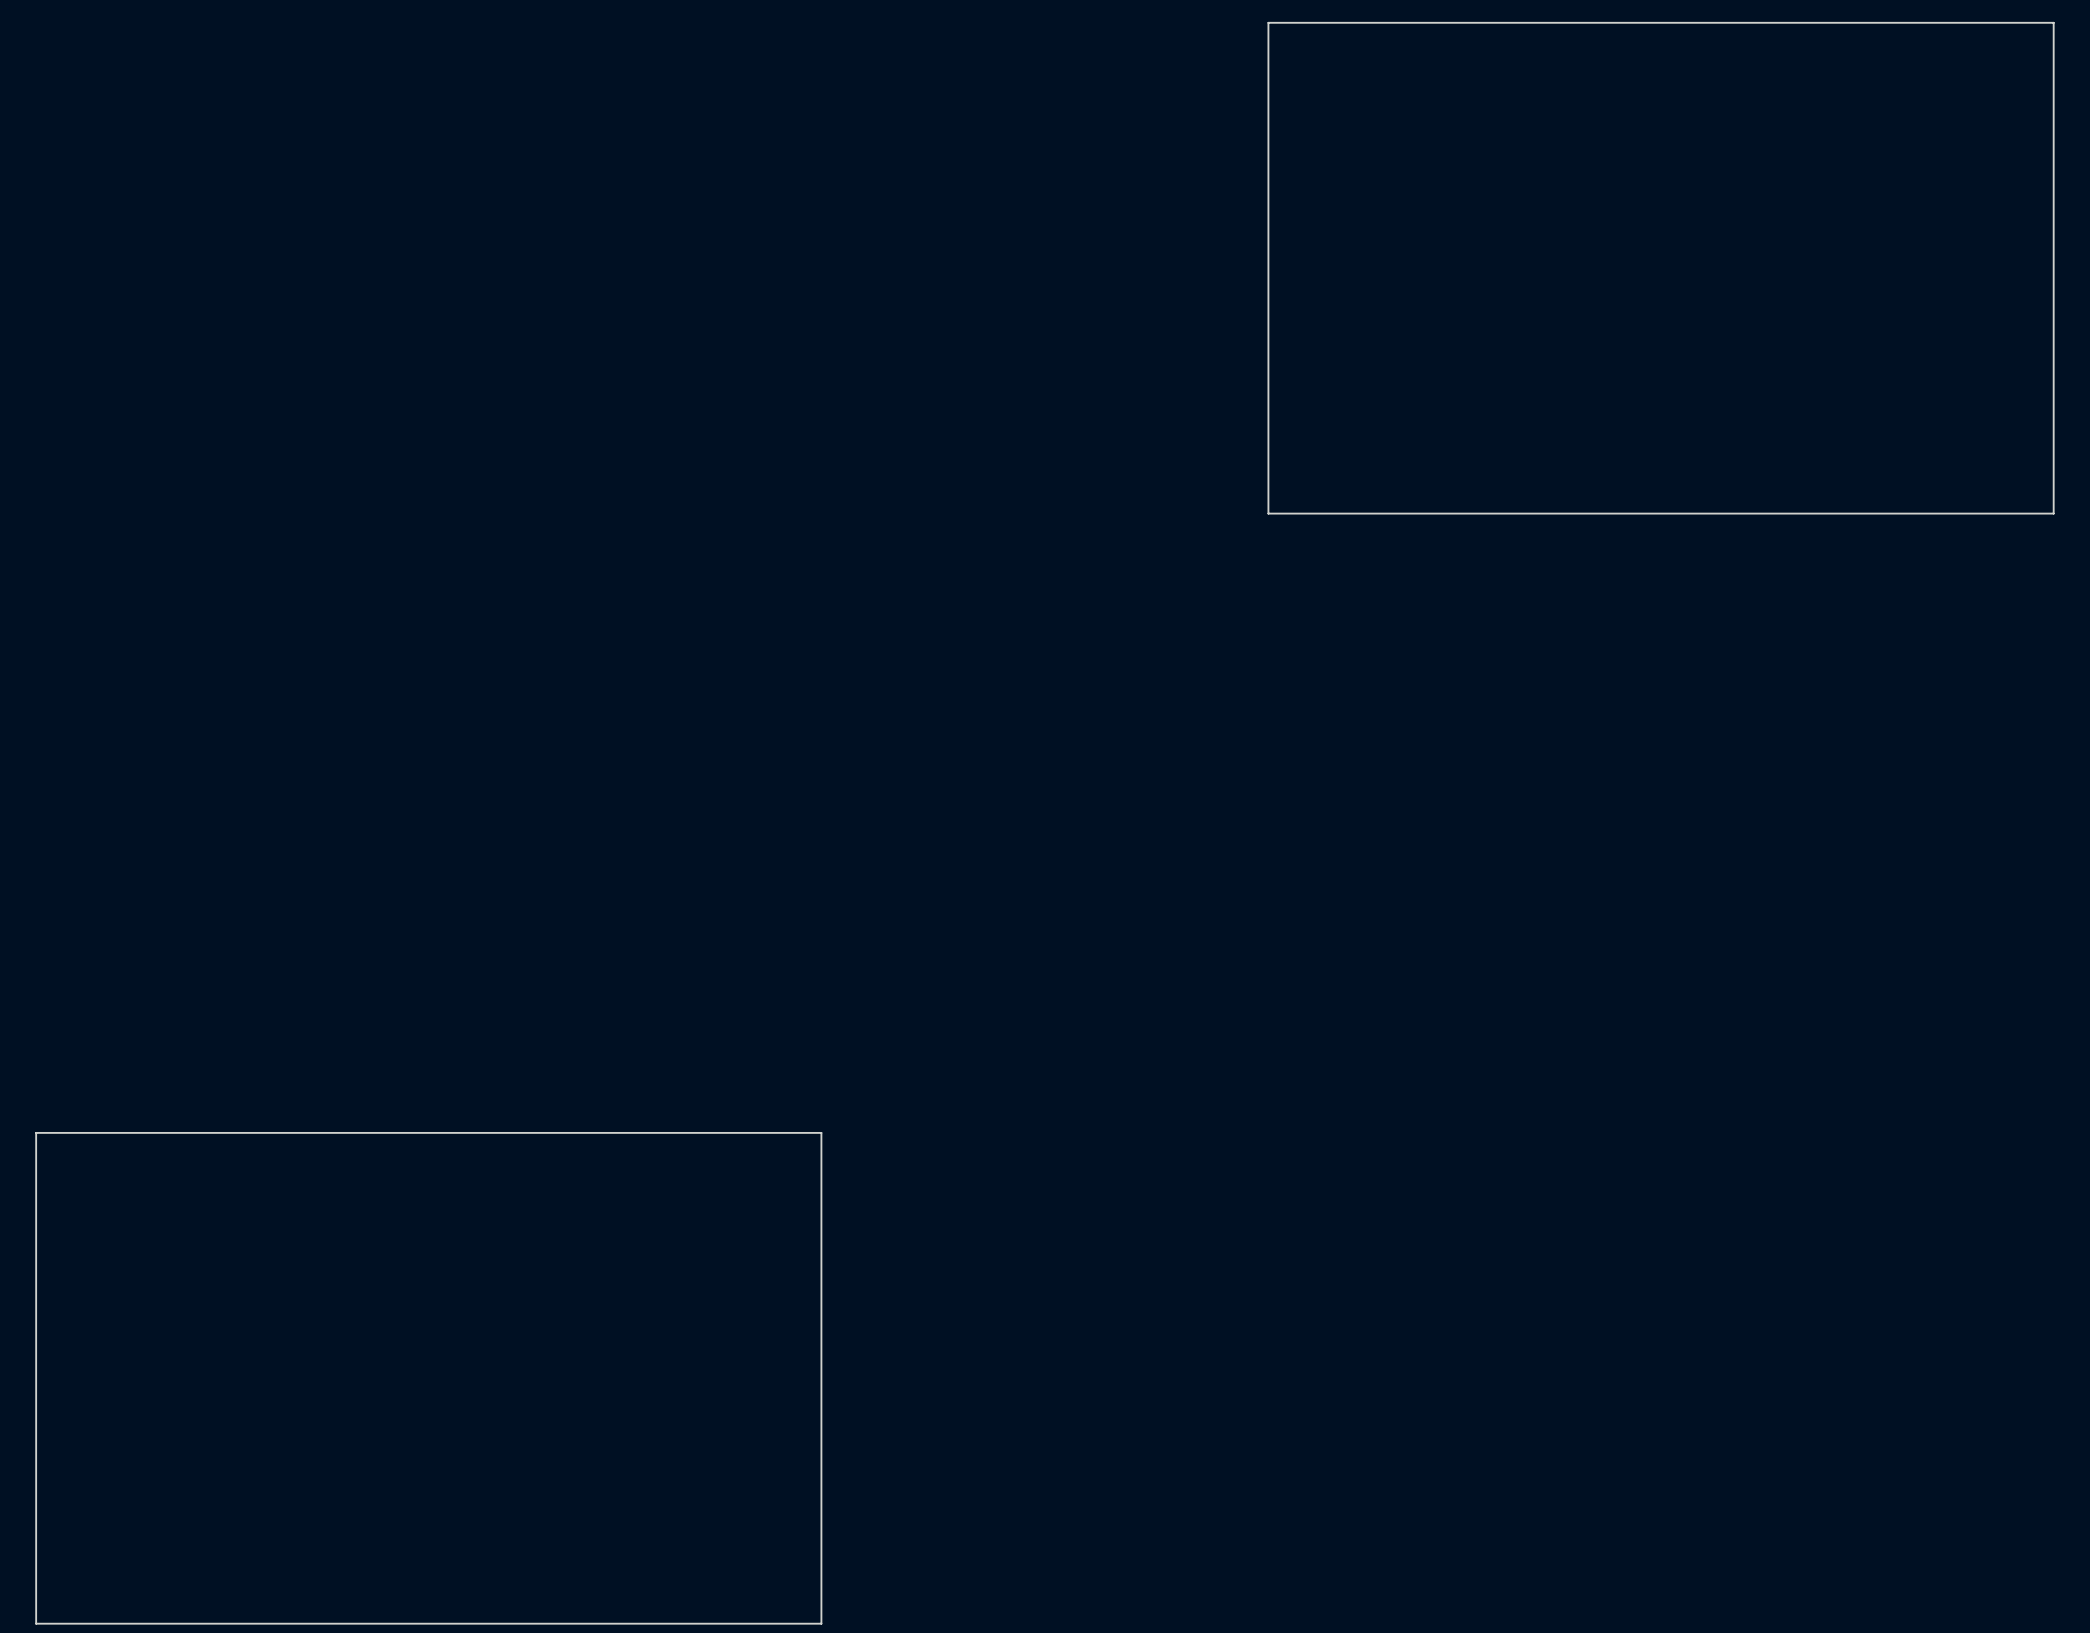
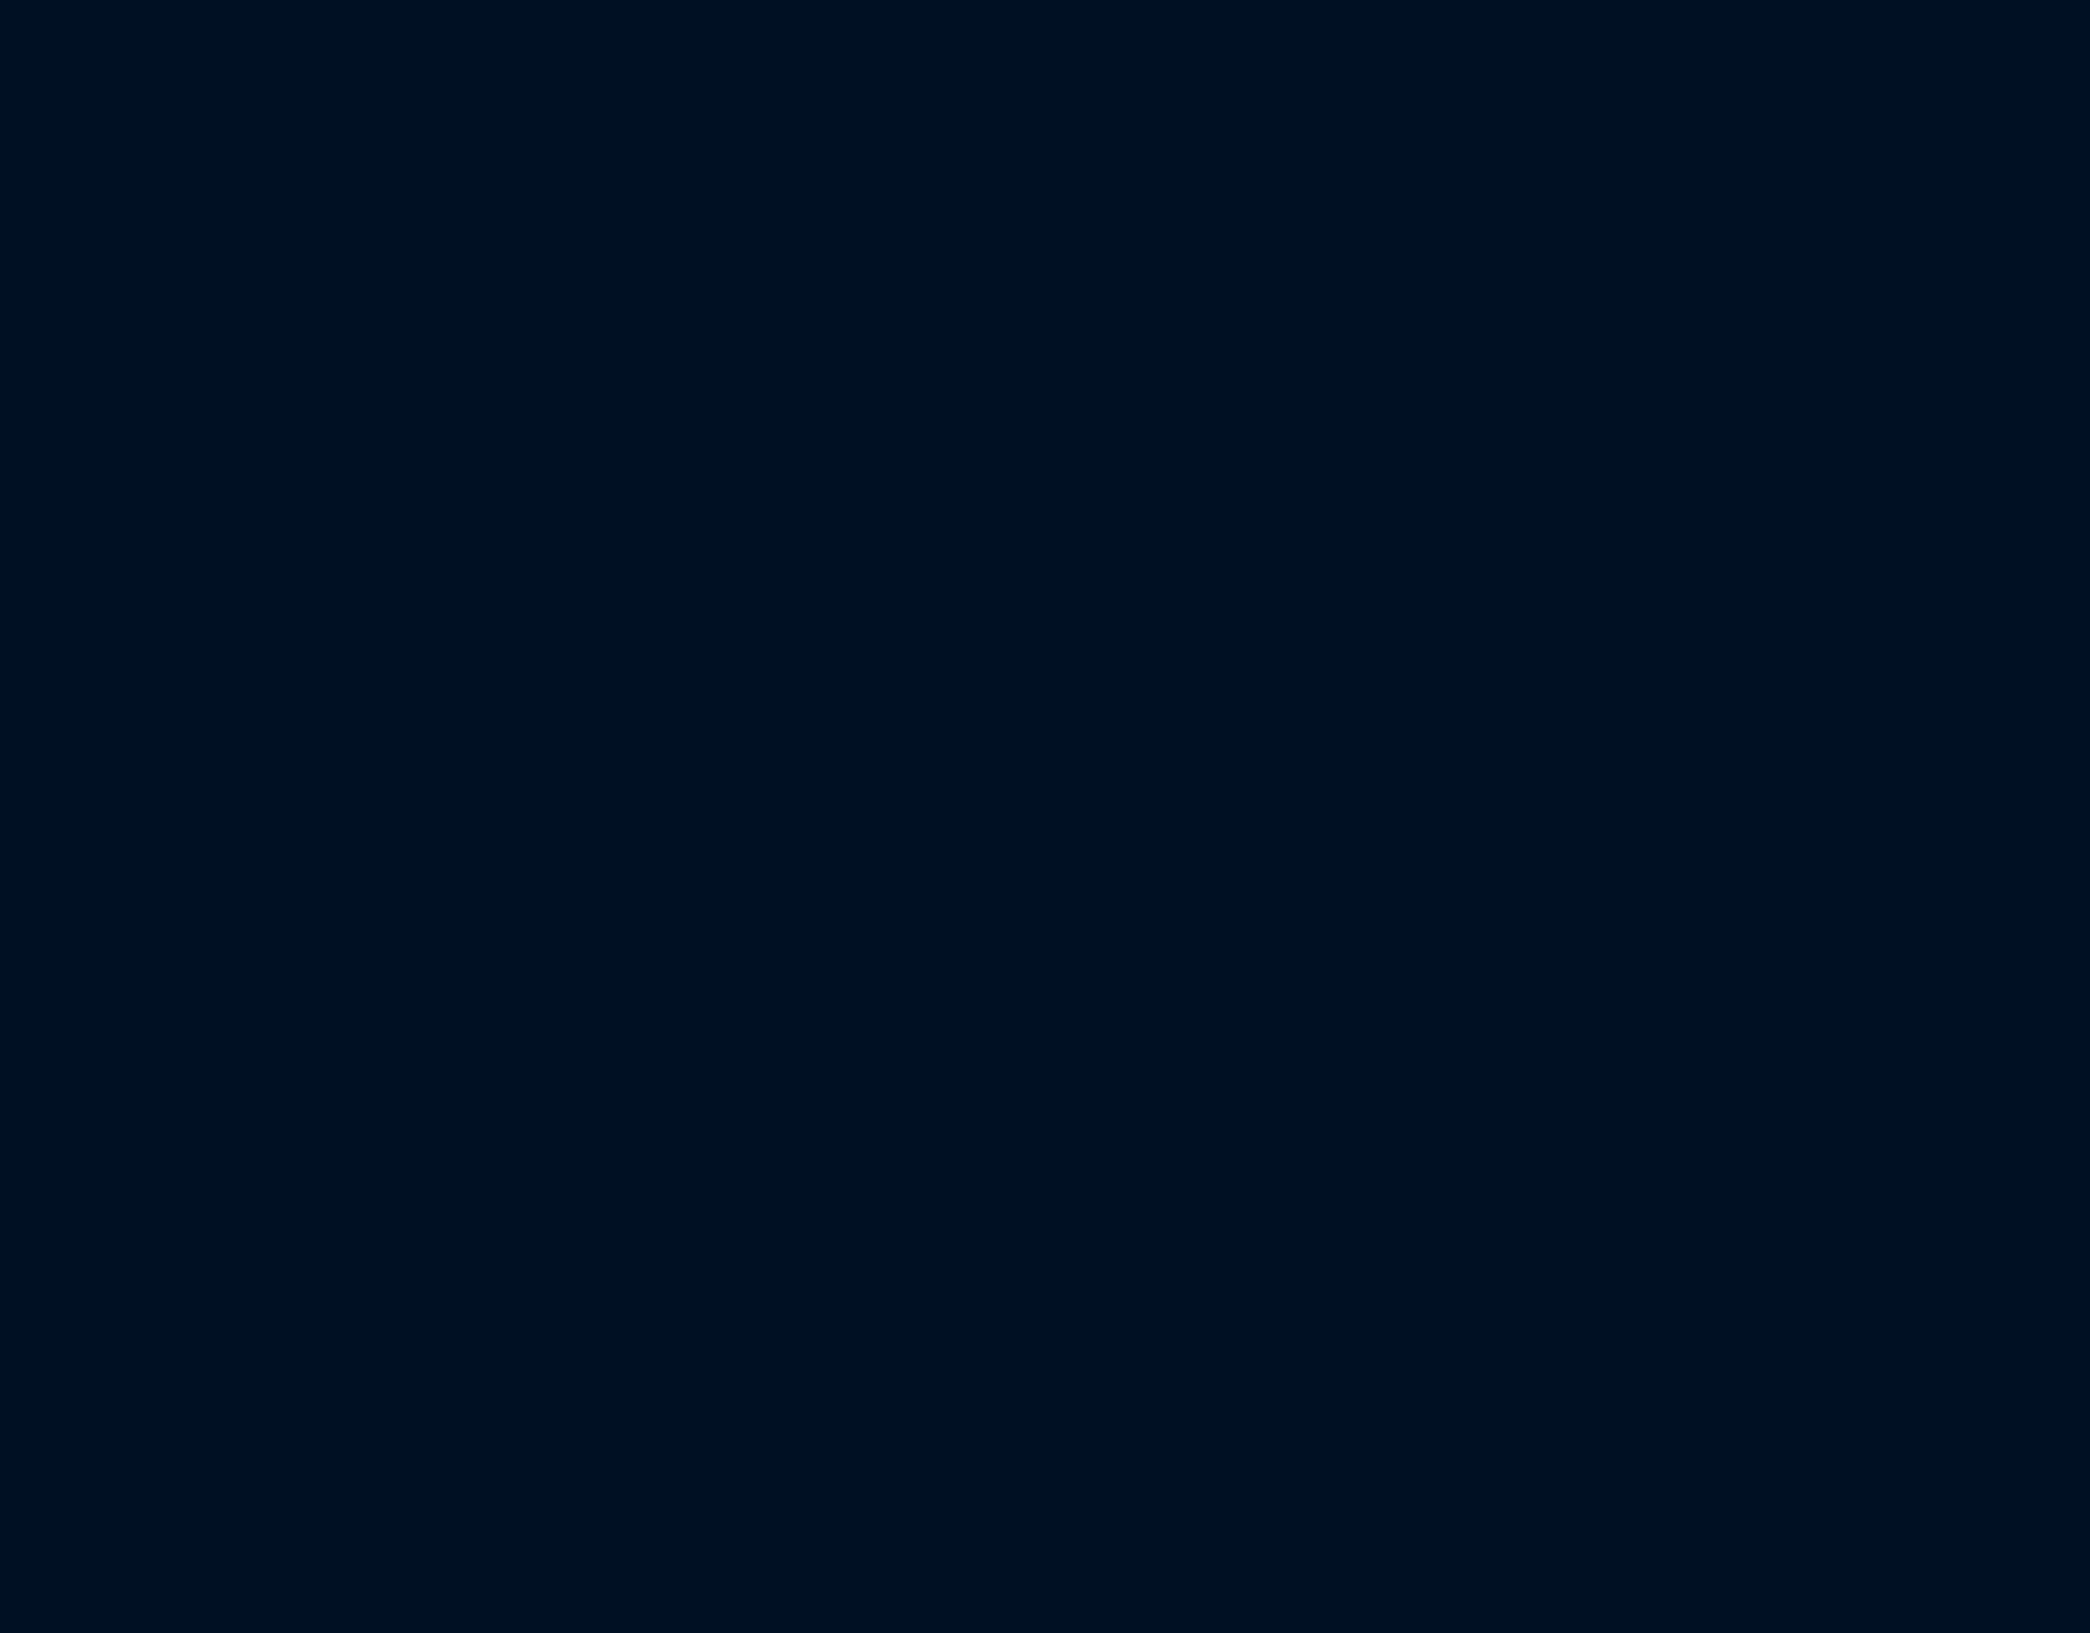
board edge: (1268, 22) (1268, 513) (2053, 513) (2053, 22) (1268, 22) -> none
board edge: (36, 1132) (36, 1623) (821, 1623) (821, 1132) (36, 1132) -> none

